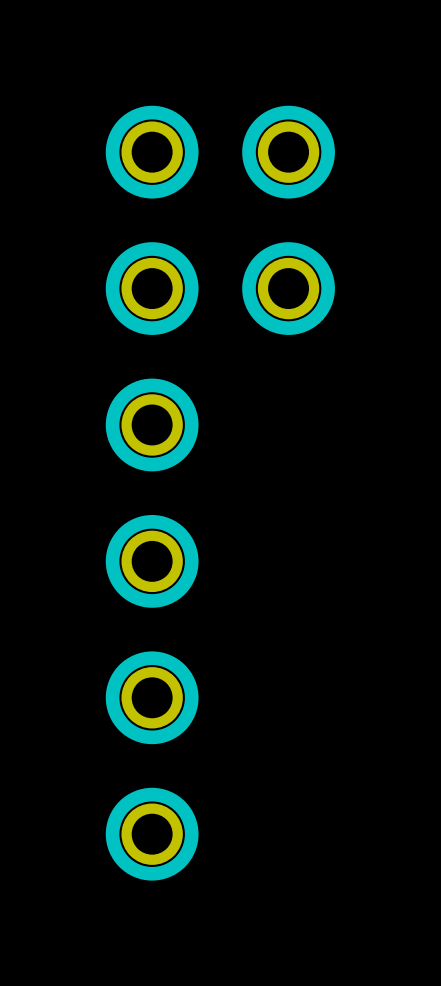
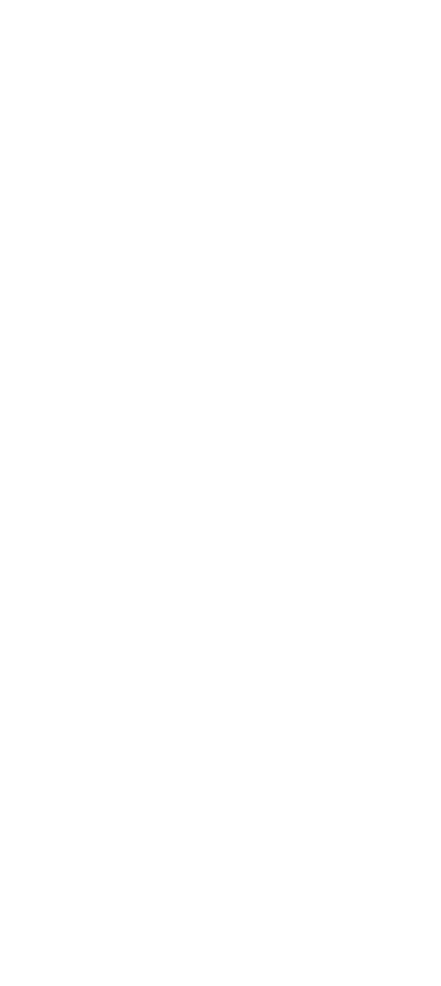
part: (152, 152) -> none
part: (288, 152) -> none
part: (152, 288) -> none
part: (288, 288) -> none
part: (152, 424) -> none
part: (152, 561) -> none
part: (152, 697) -> none
part: (152, 834) -> none

